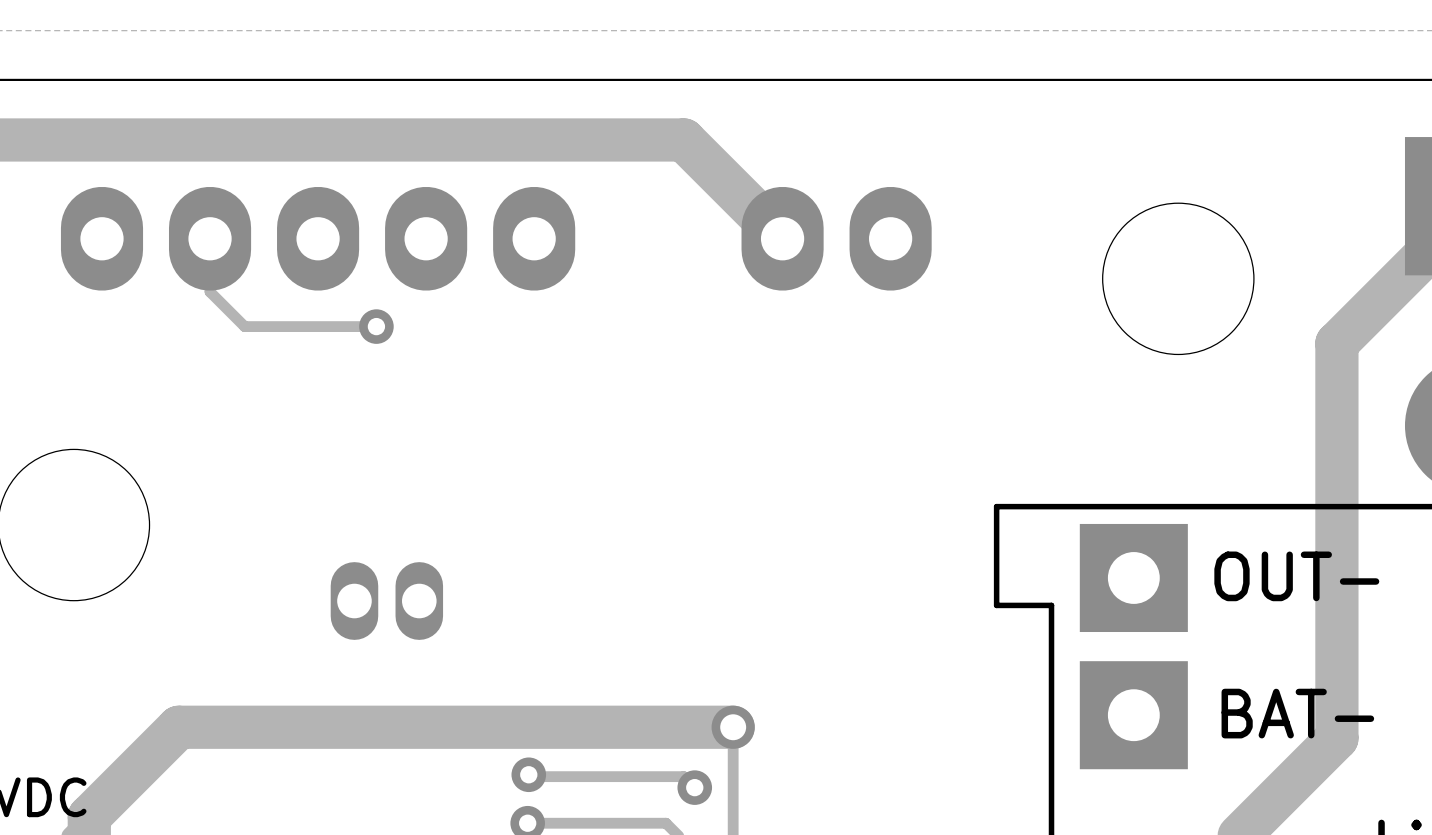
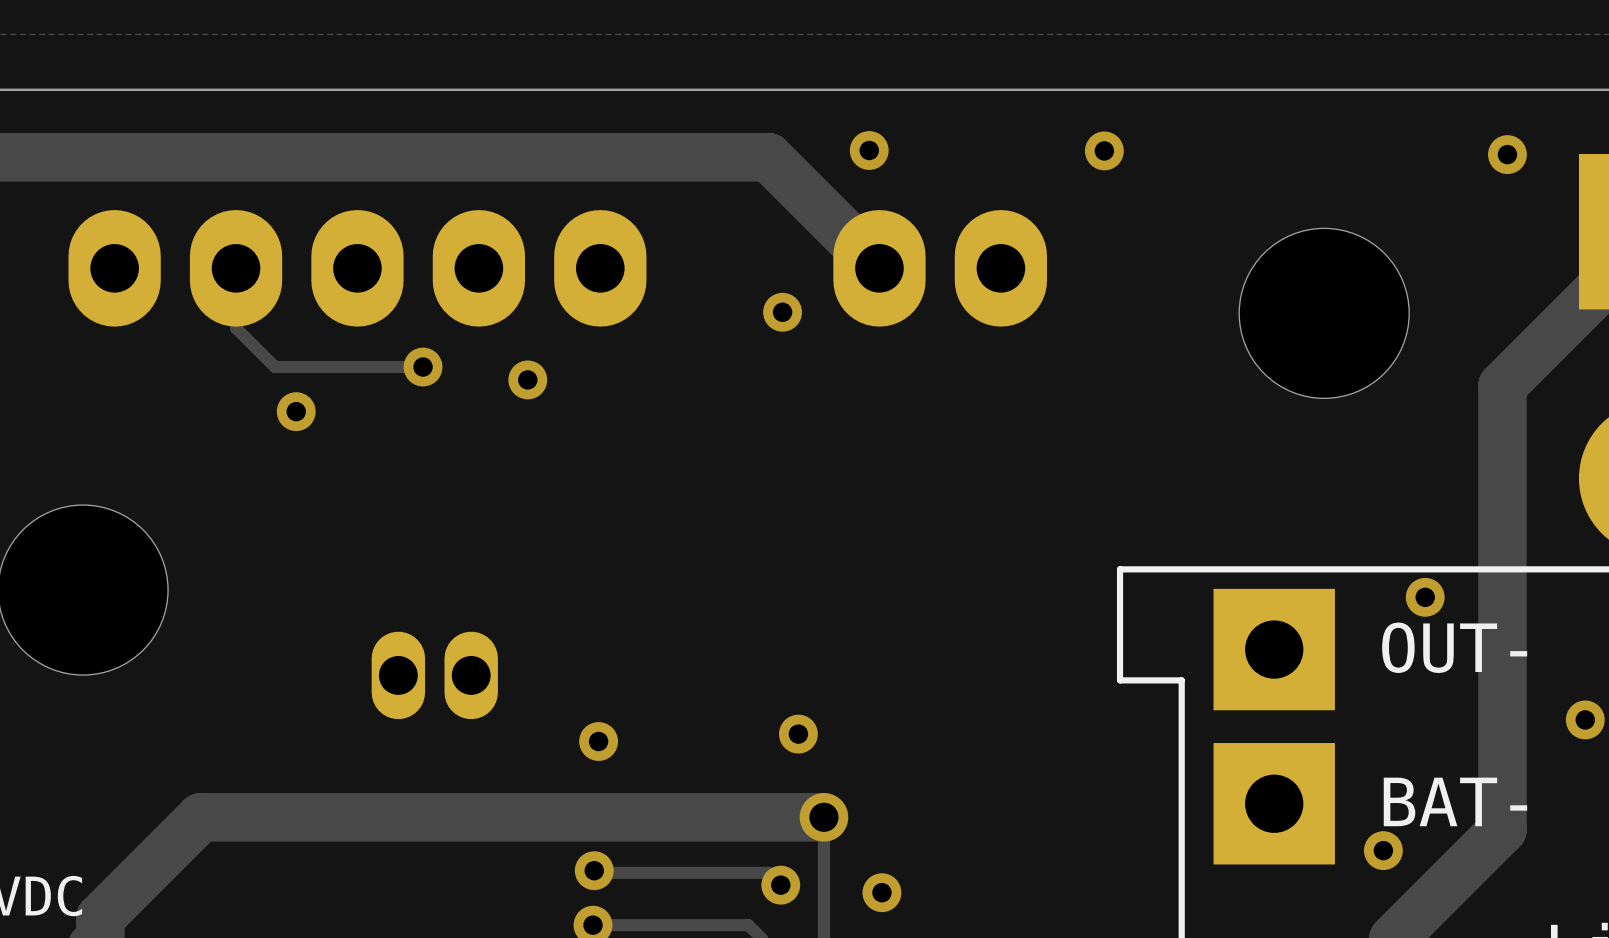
via: none -> (869, 150)
via: none -> (1104, 150)
via: none -> (1507, 154)
via: none -> (782, 312)
via: none -> (527, 379)
via: none -> (296, 411)
via: none -> (1425, 597)
via: none -> (1585, 719)
via: none -> (798, 734)
via: none -> (598, 741)
via: none -> (1383, 850)
via: none -> (881, 892)

